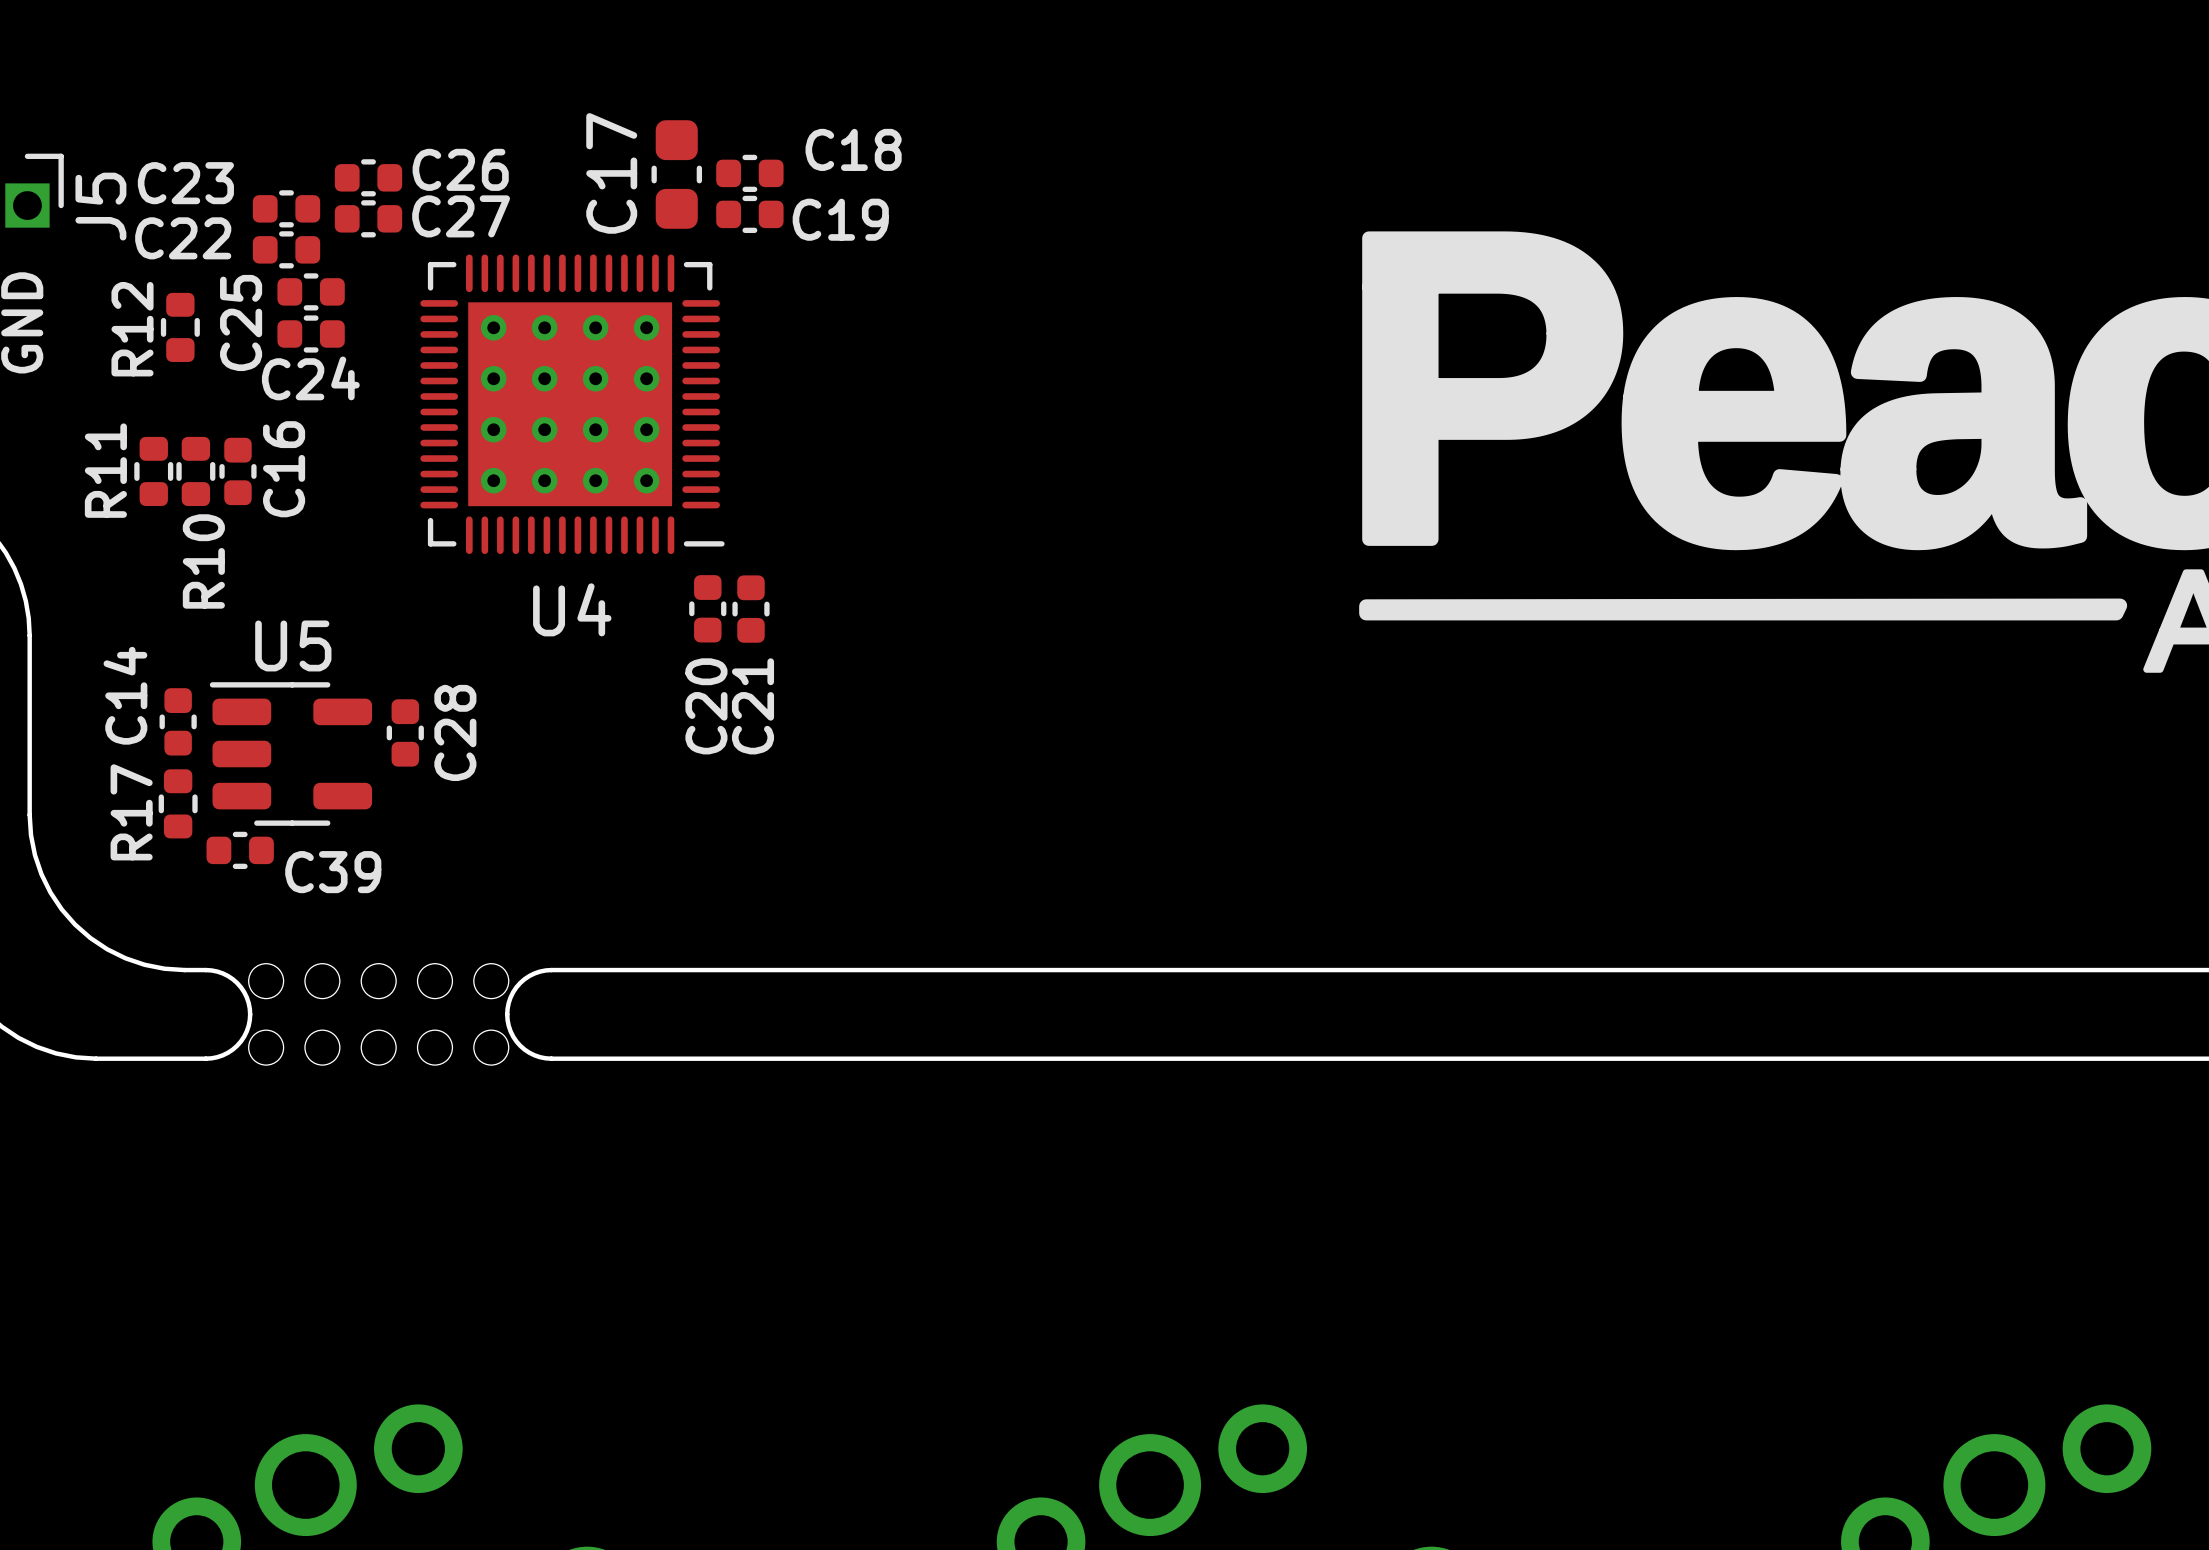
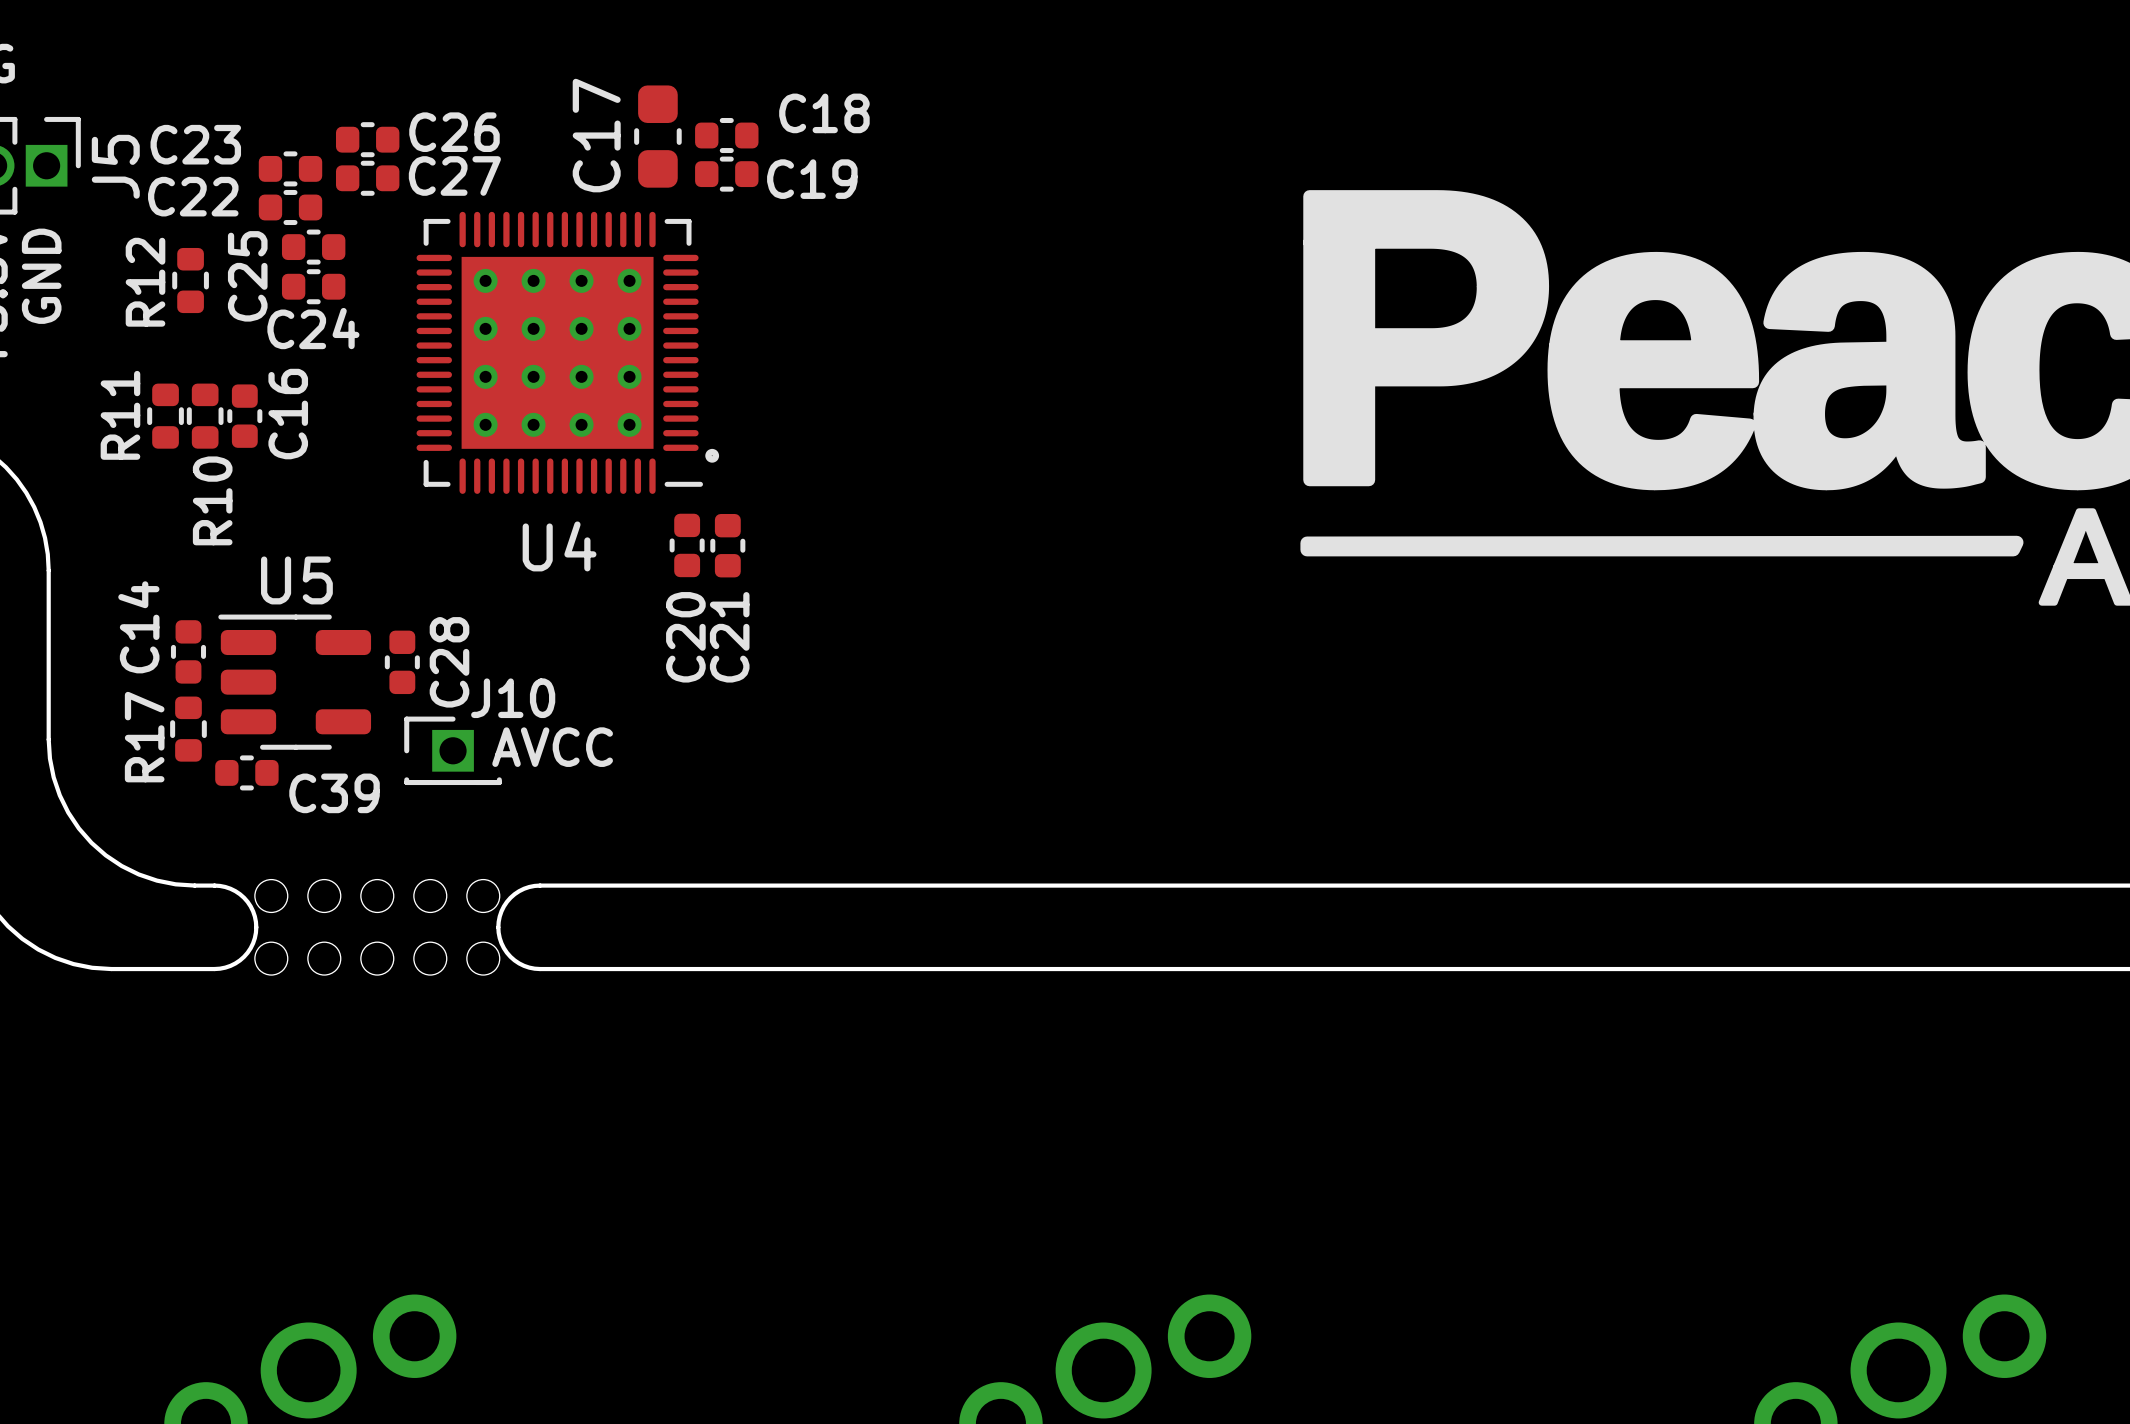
drawing: none -> [705, 448, 720, 463]
text: none -> AVCC (552, 747)
J10: none -> (453, 750)

